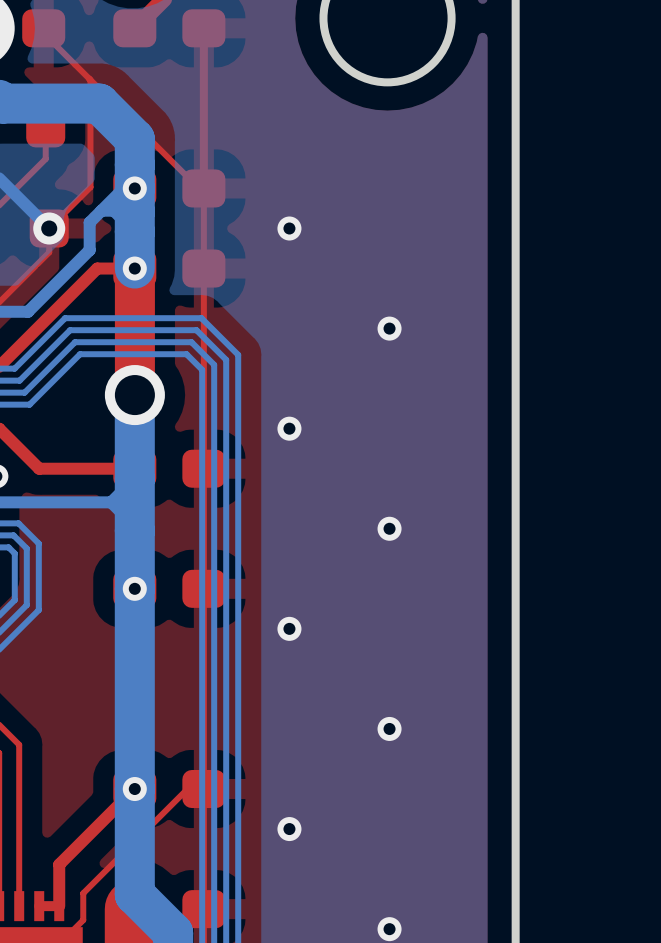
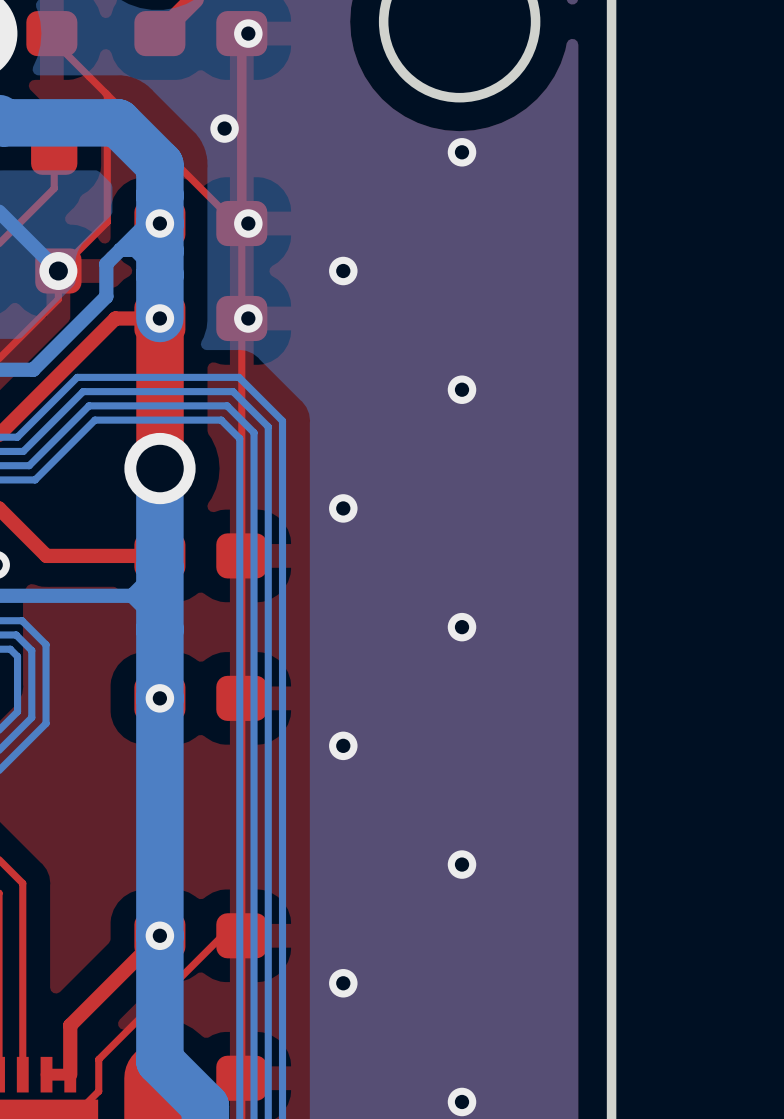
via: none -> (248, 33)
via: none -> (224, 128)
via: none -> (462, 152)
via: none -> (248, 223)
via: none -> (248, 318)

